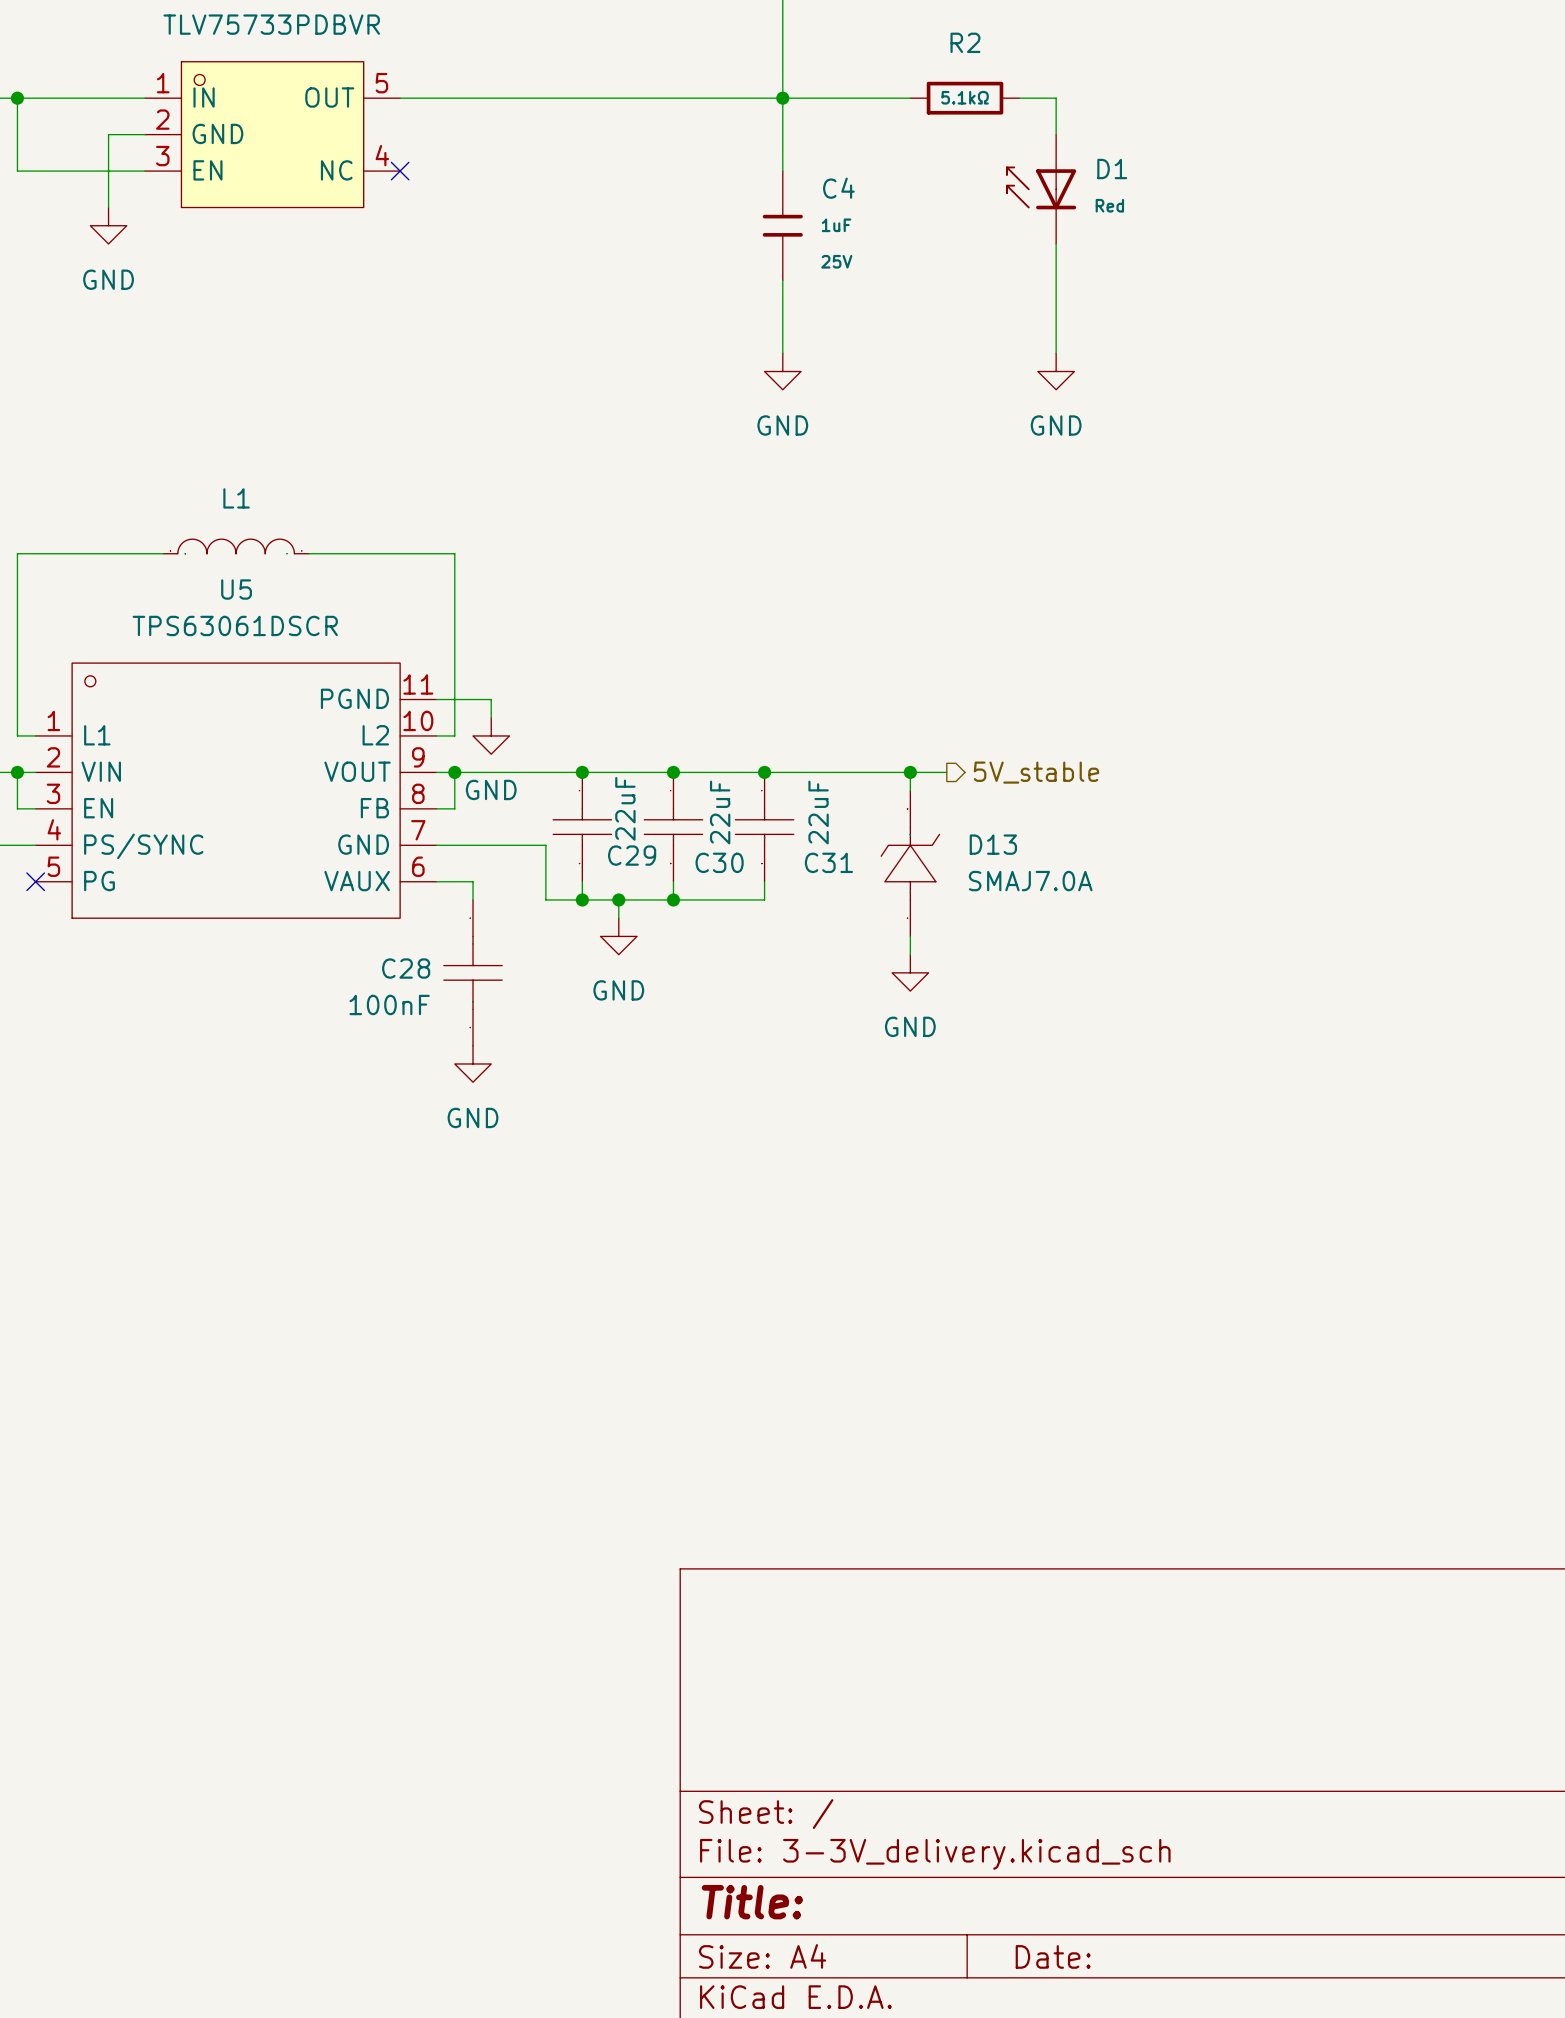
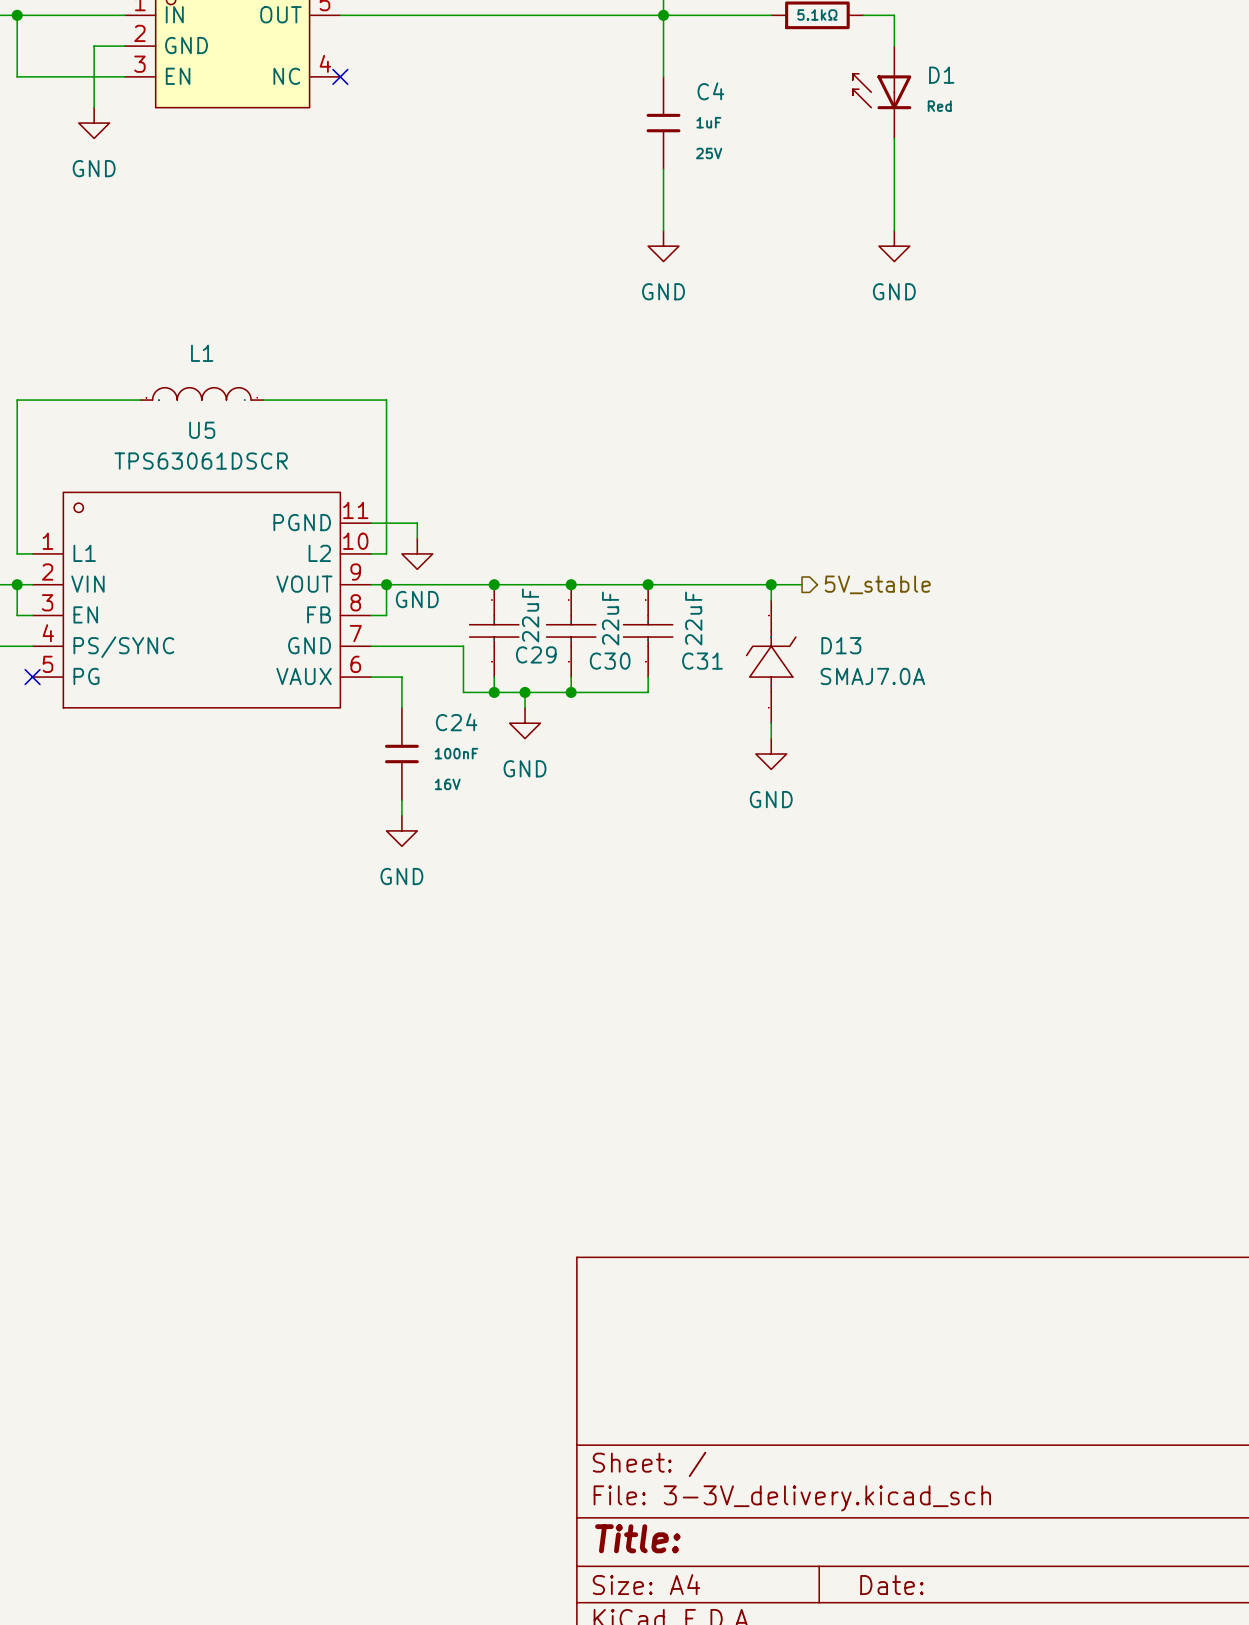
C28: 100nF (473, 972) -> none
C24: none -> 100nF (401, 753)

